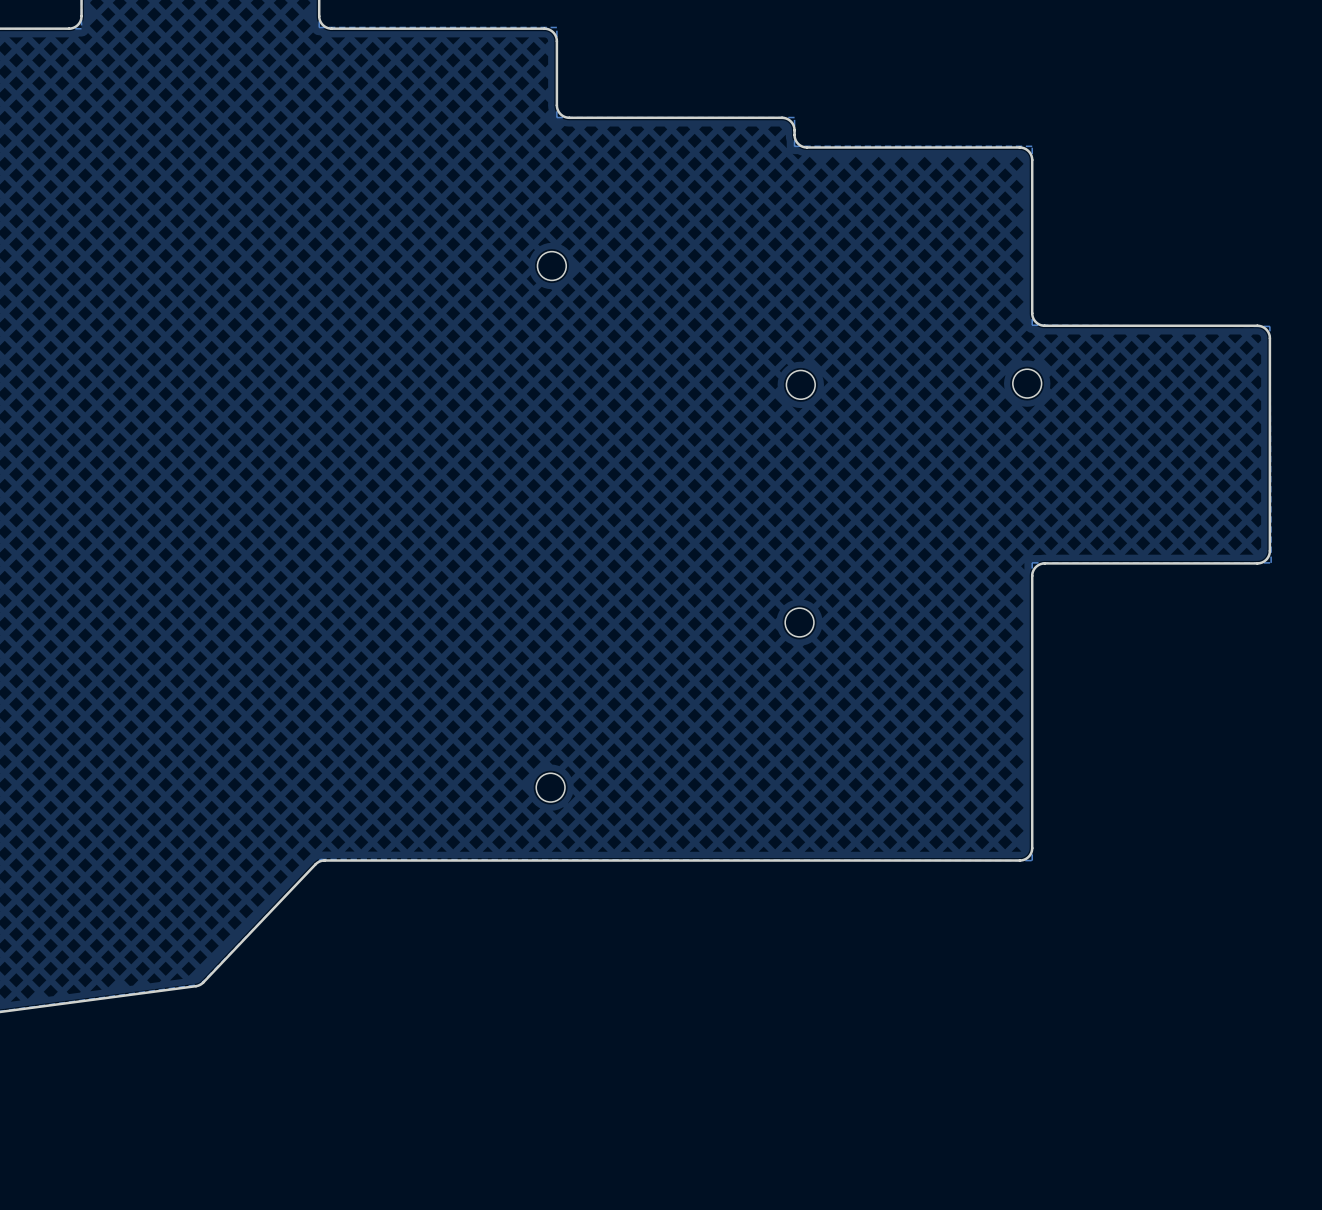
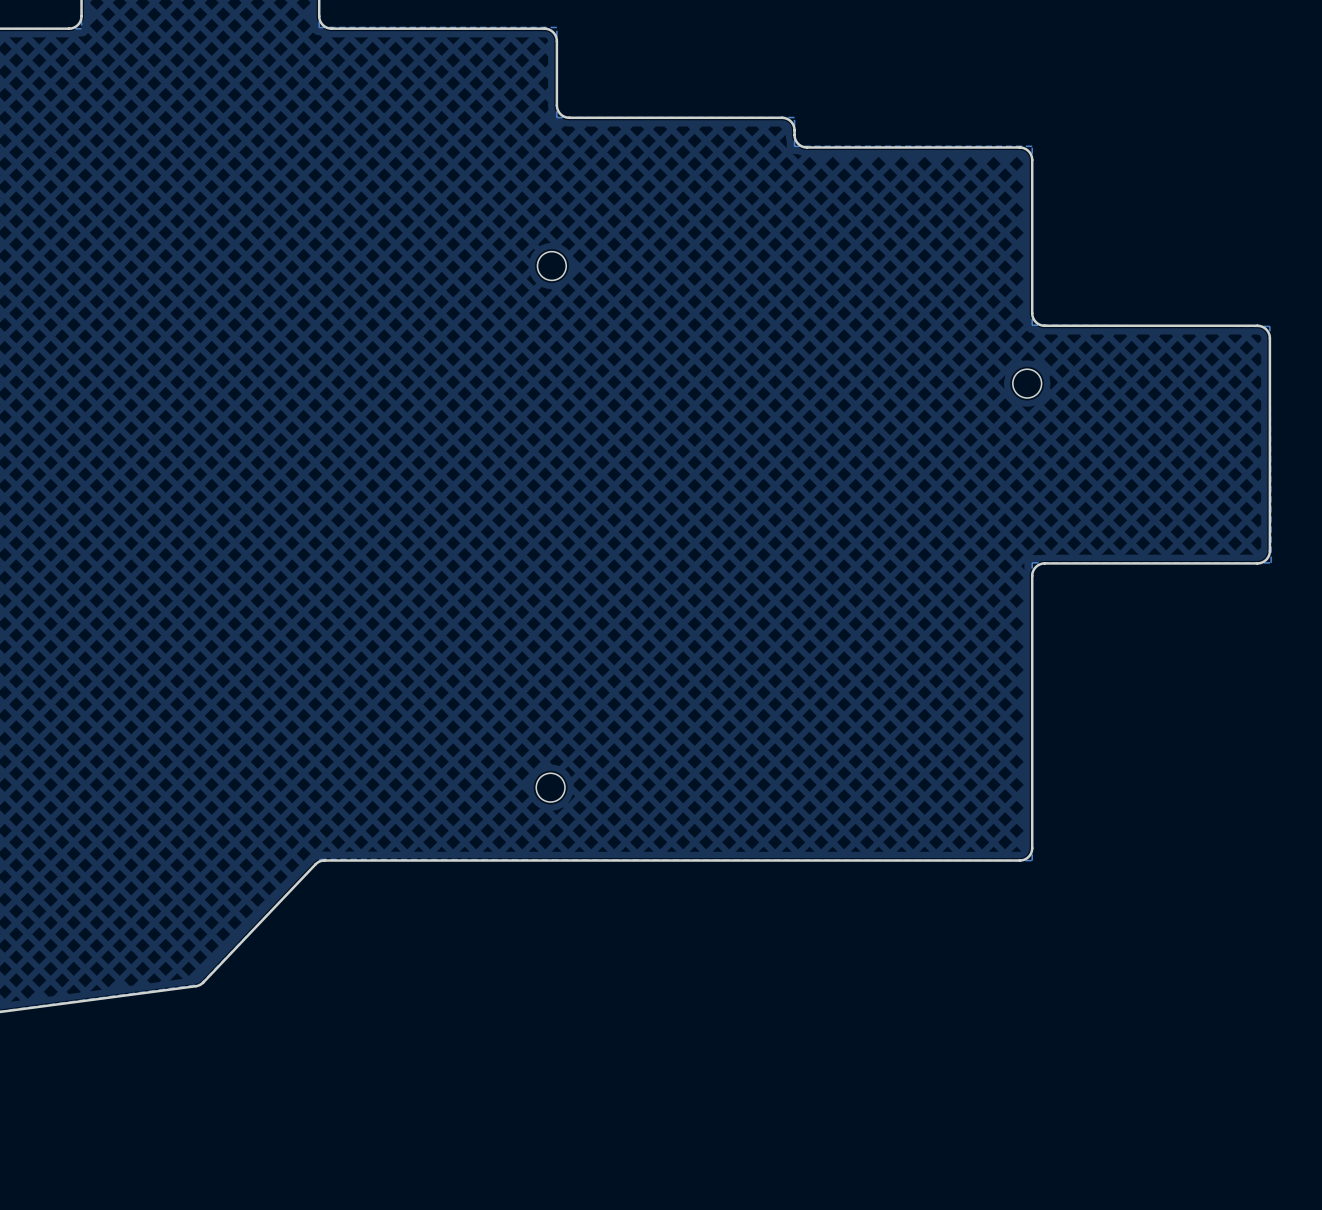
drawing: [785, 369, 816, 400] -> none
drawing: [784, 607, 815, 638] -> none

